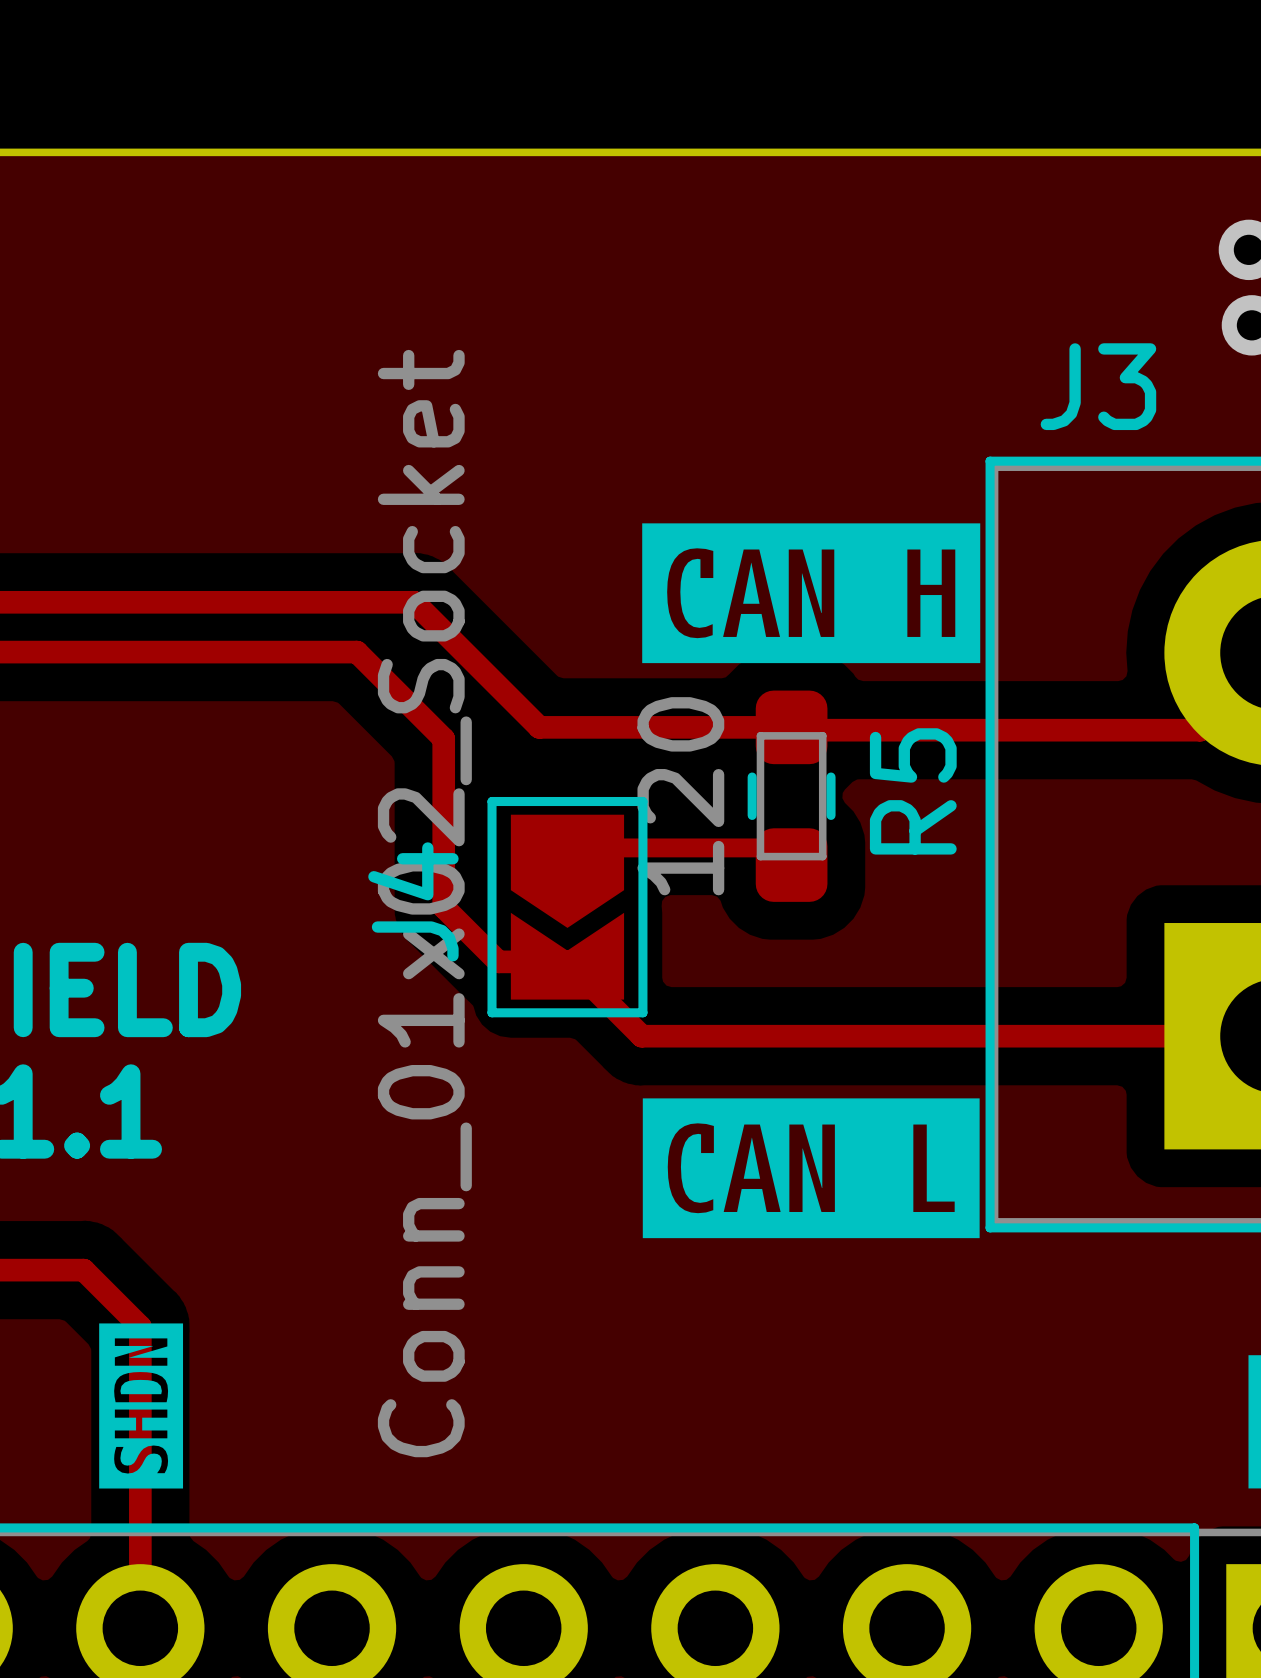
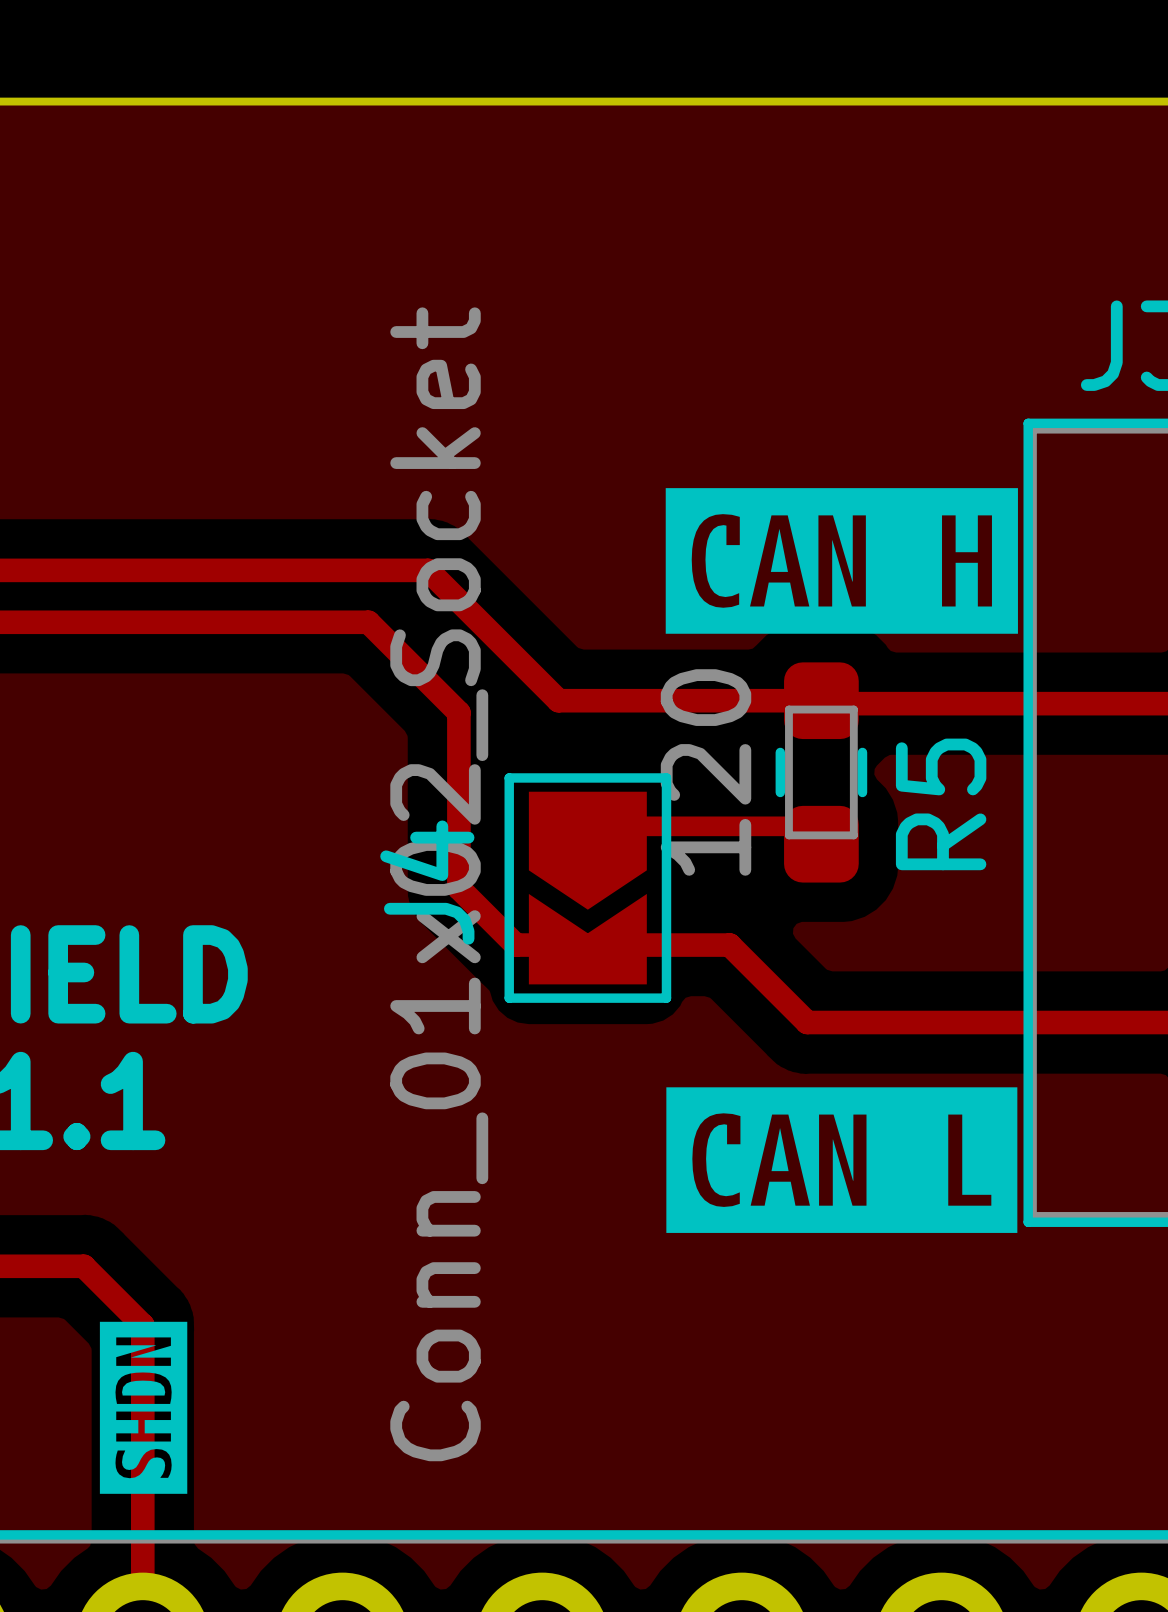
R5 name position: R5 (913, 791) -> R5 (941, 804)
track: (567, 961) (641, 1036) (778, 1036) -> (587, 945) (729, 945) (807, 1022)

